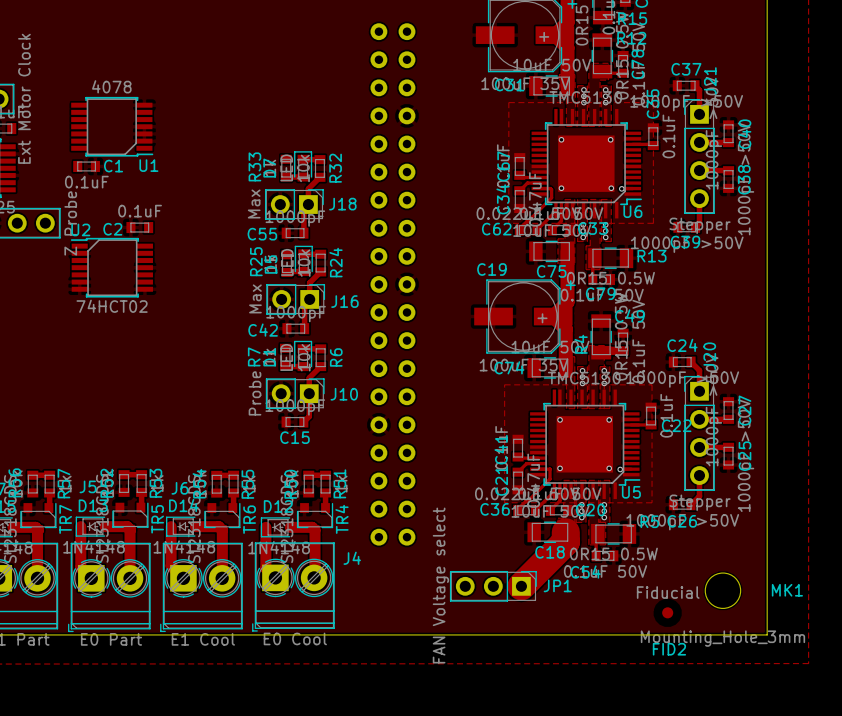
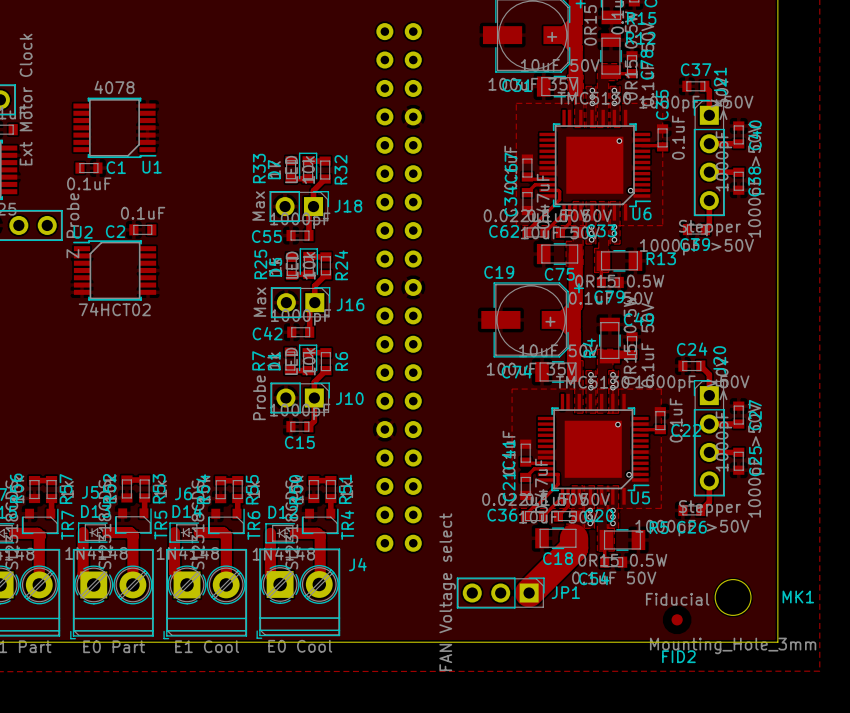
via: (561, 139) -> none
via: (561, 188) -> none
via: (611, 188) -> none
via: (560, 419) -> none
via: (560, 468) -> none
via: (609, 468) -> none

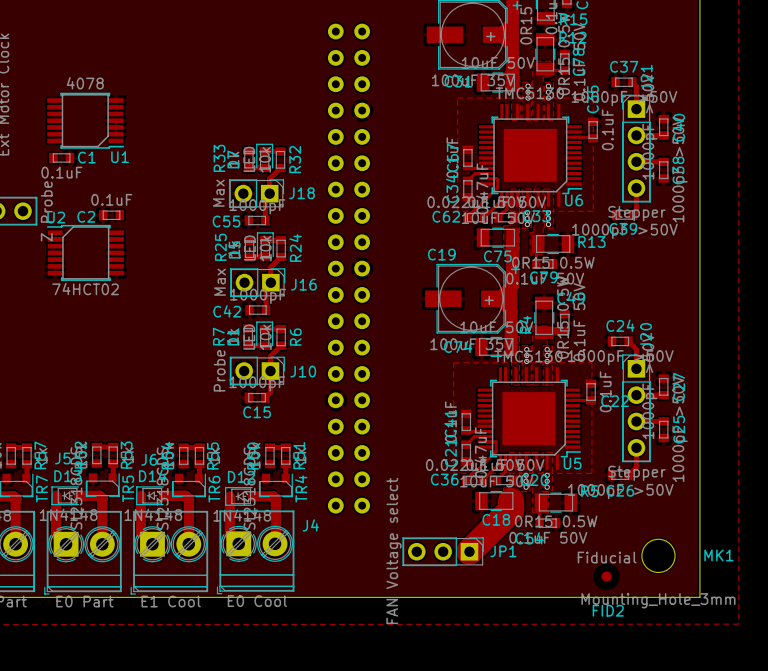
via: (619, 141) -> none
via: (630, 190) -> none
via: (617, 424) -> none
via: (629, 474) -> none

